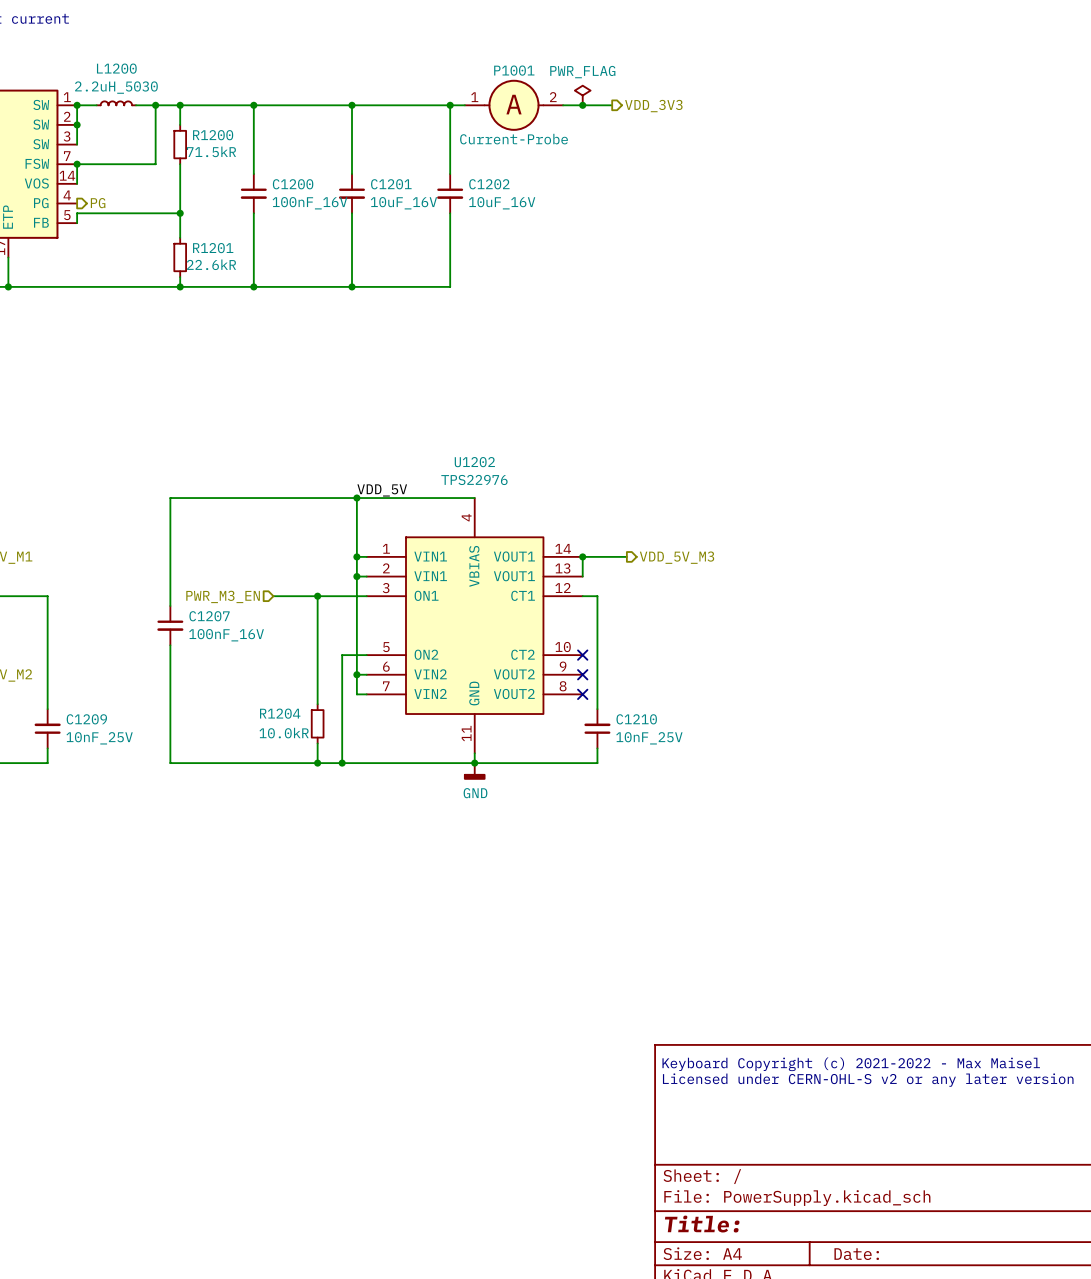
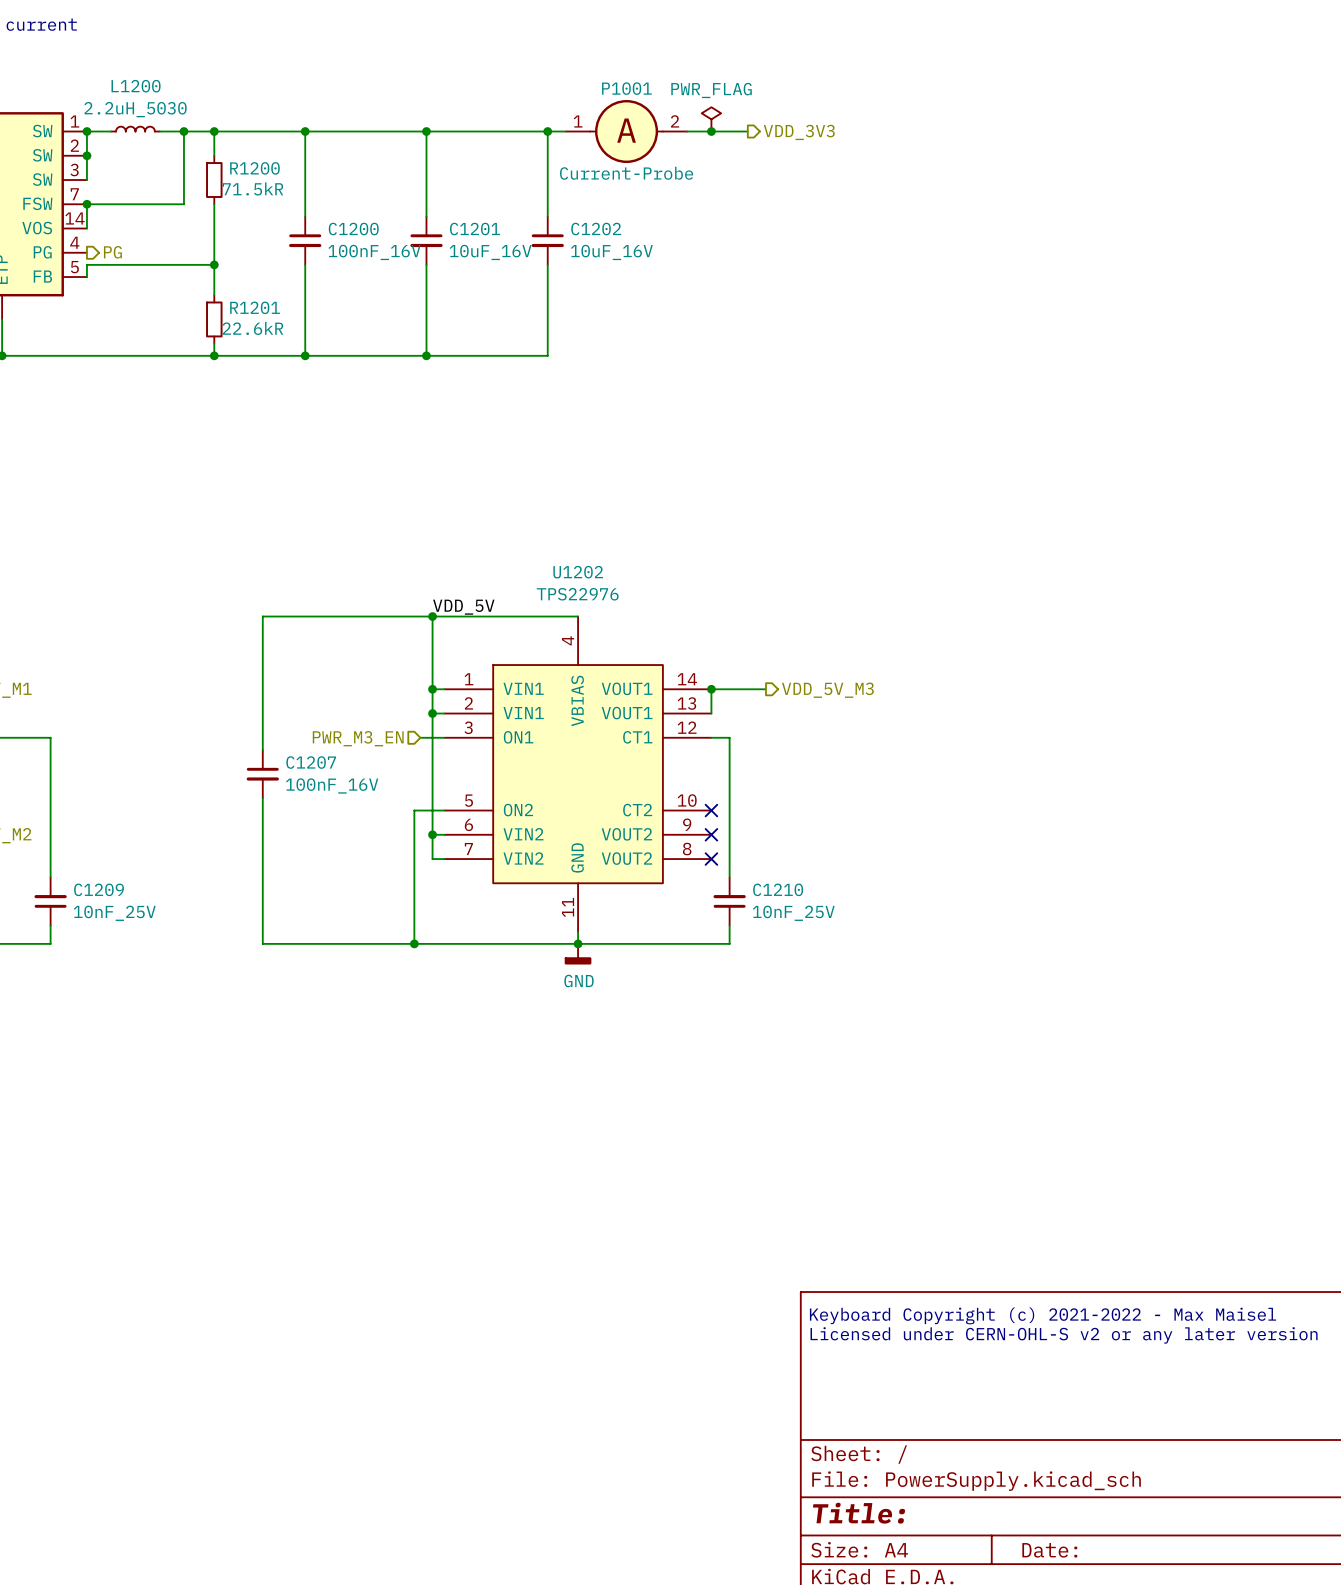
wire: (219, 498) (170, 498) (170, 606) -> (262, 616) (262, 749)
hierarchical label position: PWR_M3_EN (223, 596) -> PWR_M3_EN (358, 738)
wire: (273, 596) (347, 596) -> none
wire: (317, 596) (317, 704) -> none
junction: (317, 596) -> none
C1207 position: (170, 625) -> (262, 774)
wire: (170, 645) (170, 763) (219, 763) -> (262, 798) (262, 943)
R1204: 10.0kR (317, 723) -> none
wire: (317, 743) (317, 763) -> none
junction: (317, 763) -> none

